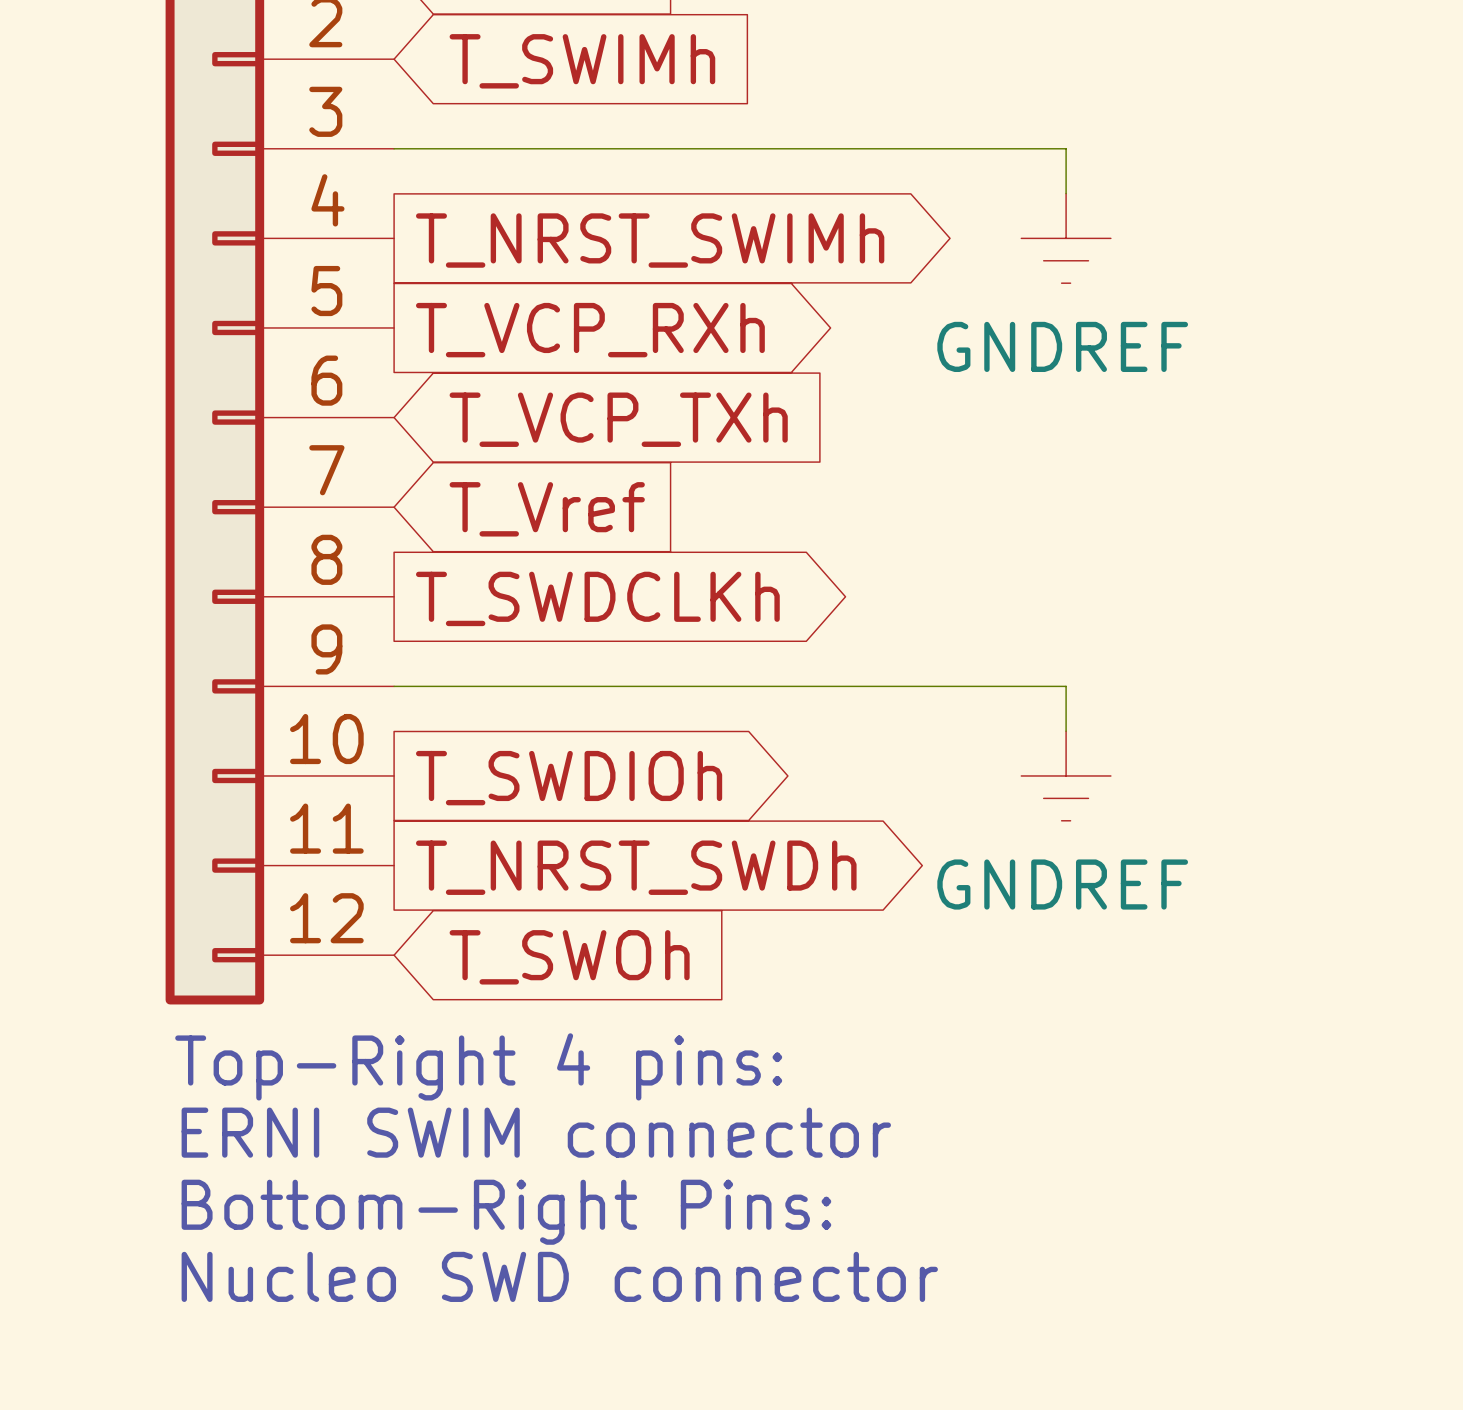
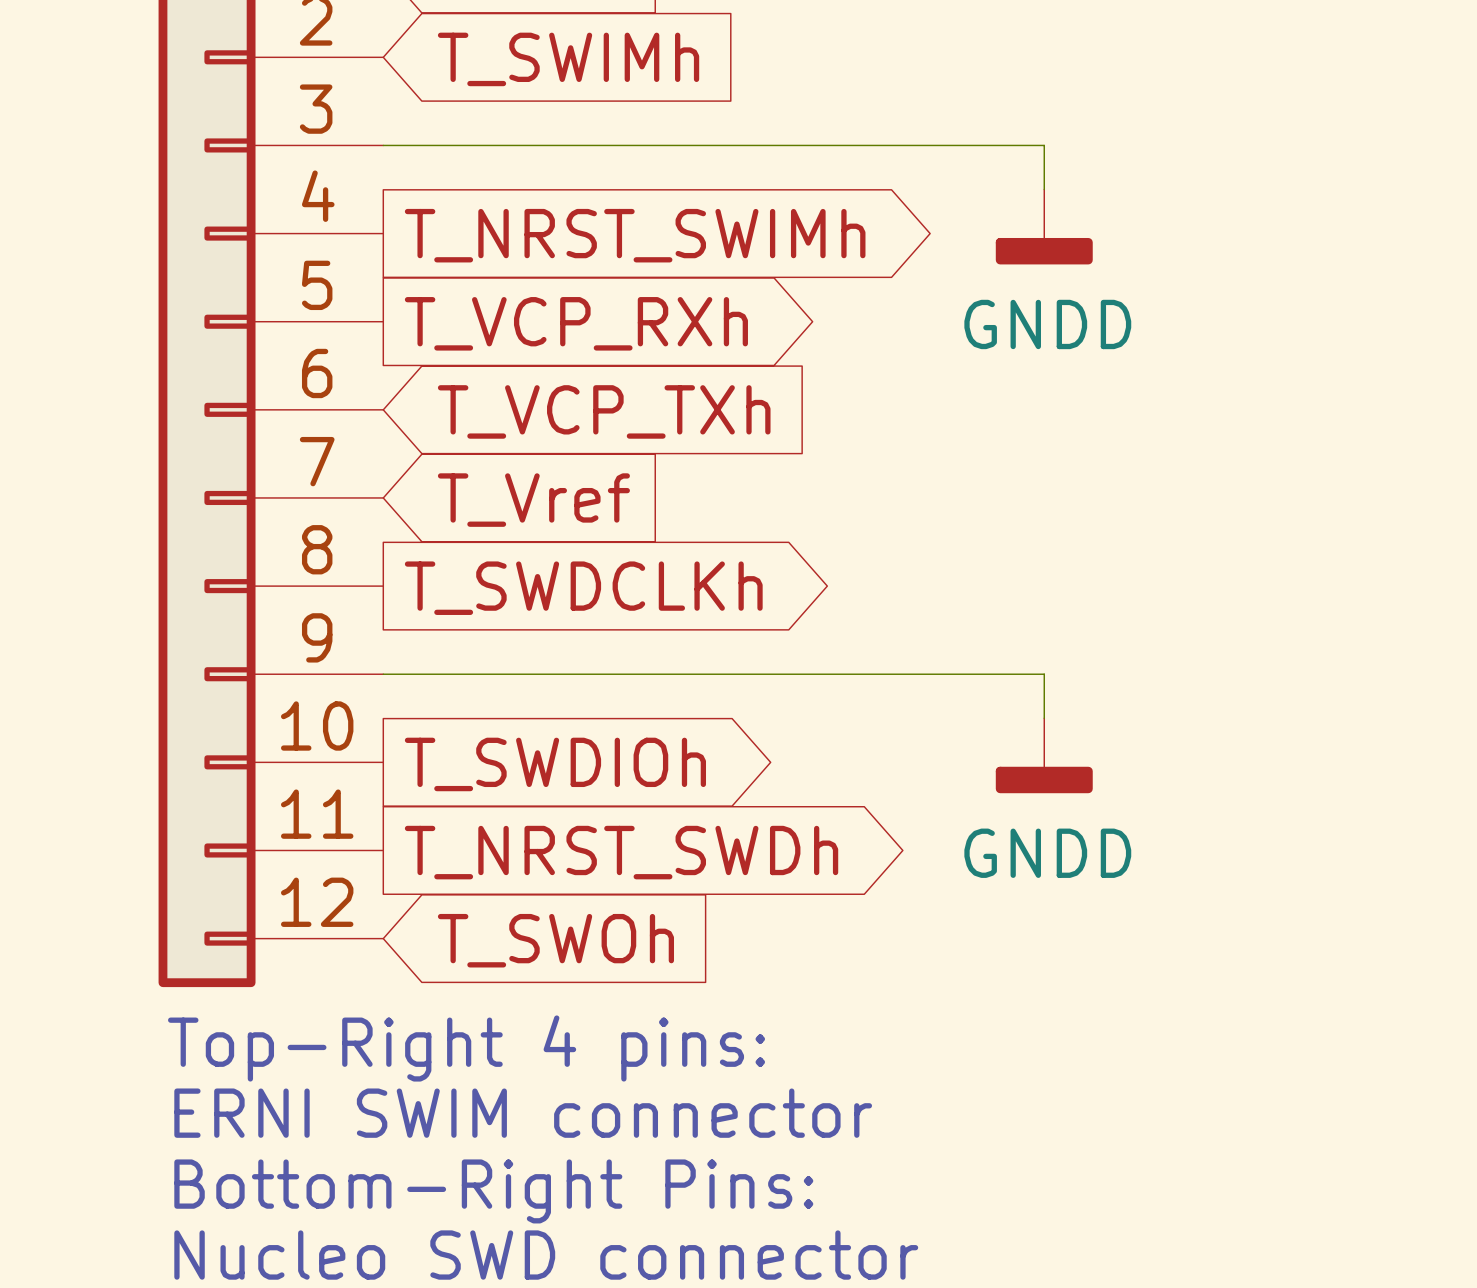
power symbol: GNDREF (1066, 238) -> GNDD (1044, 226)
power symbol: GNDREF (1066, 775) -> GNDD (1044, 755)

